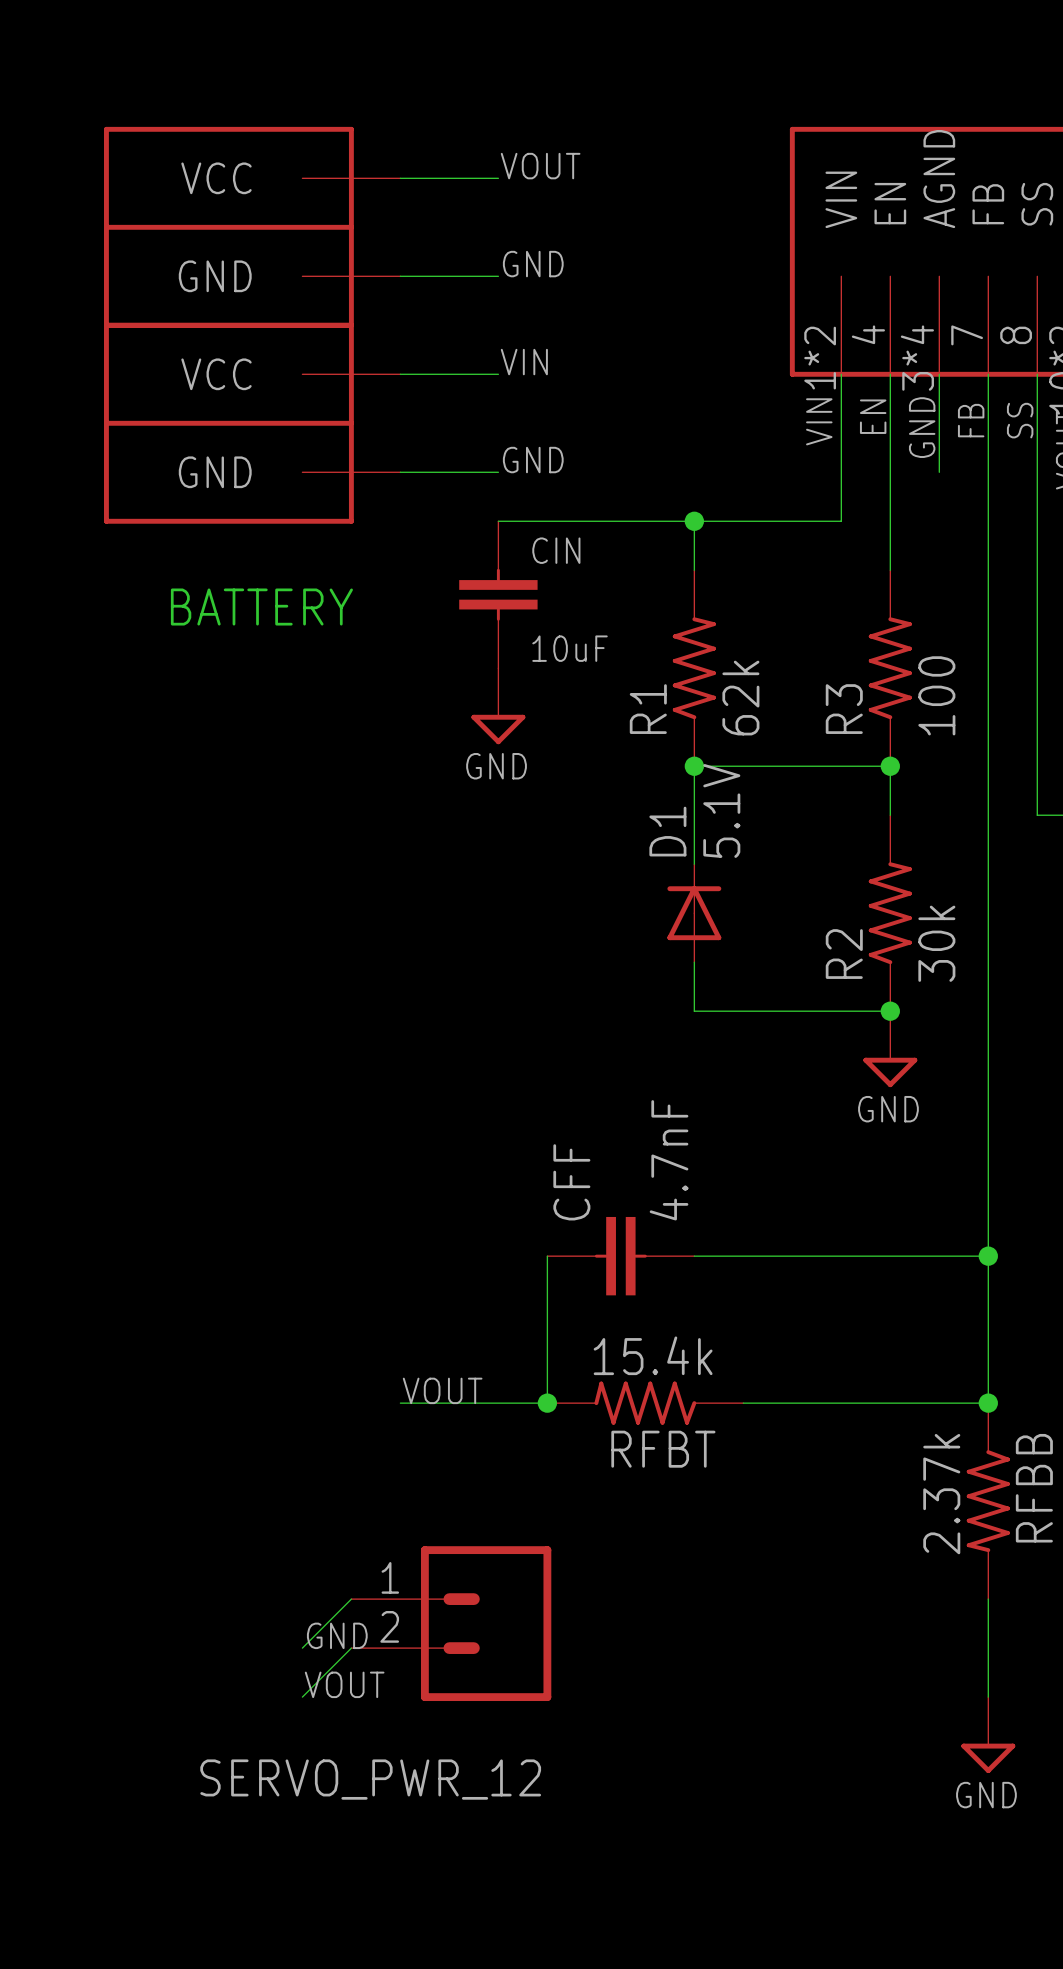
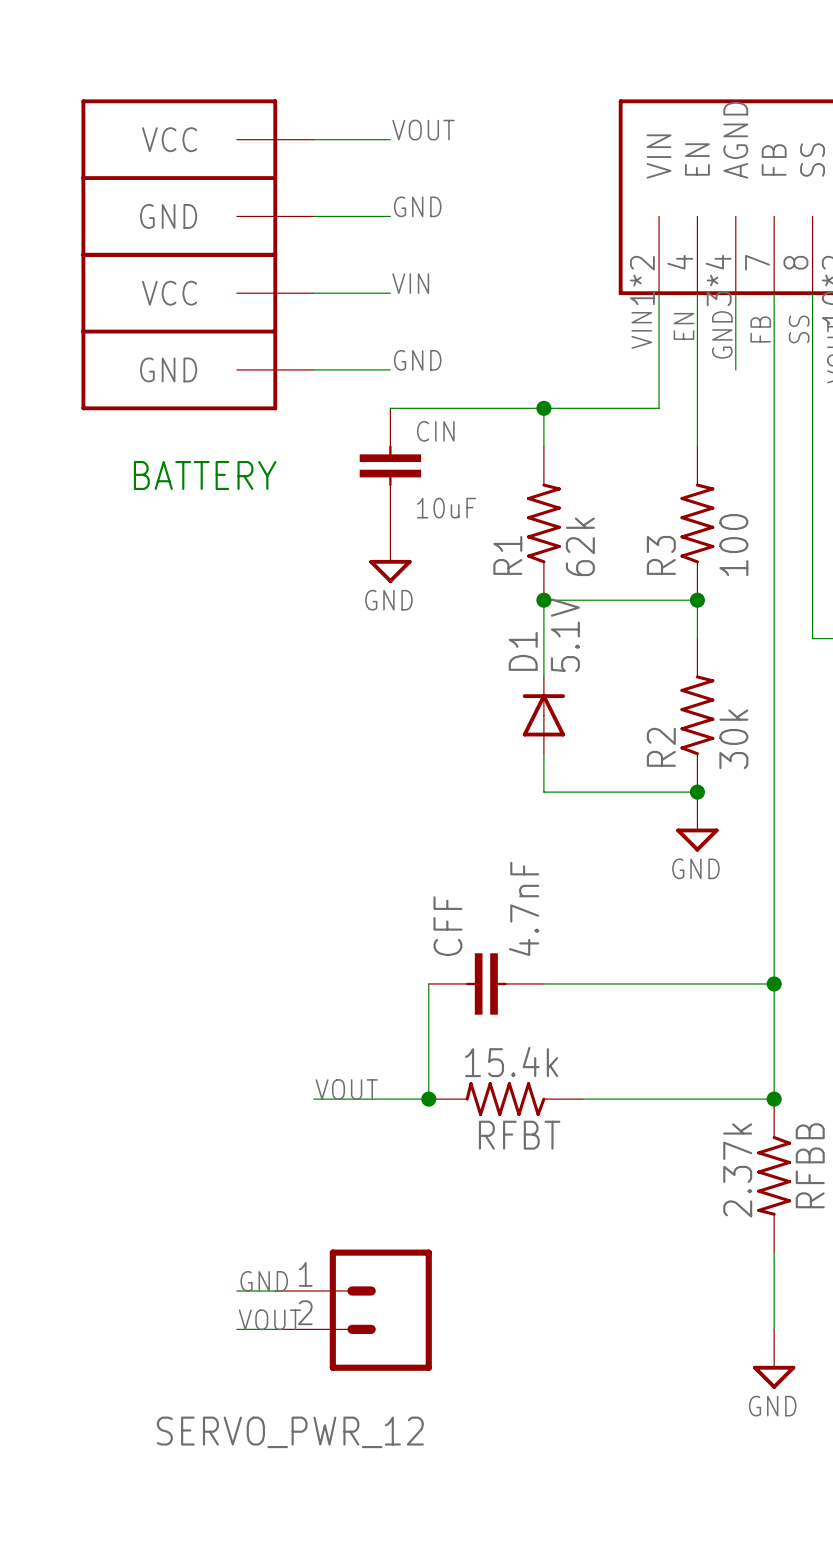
wire: (351, 1599) (302, 1648) -> (275, 1290) (236, 1290)
SERVO_PWR_12 position: (451, 1623) -> (353, 1310)
wire: (351, 1648) (302, 1697) -> (275, 1329) (236, 1329)

